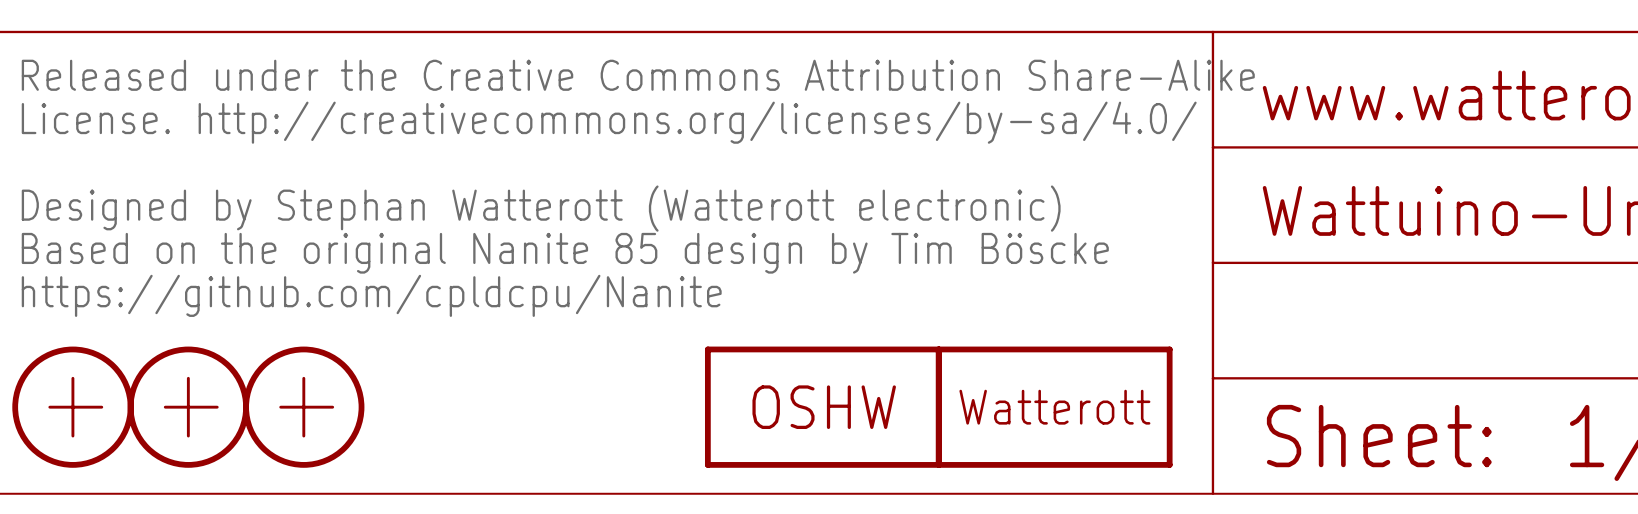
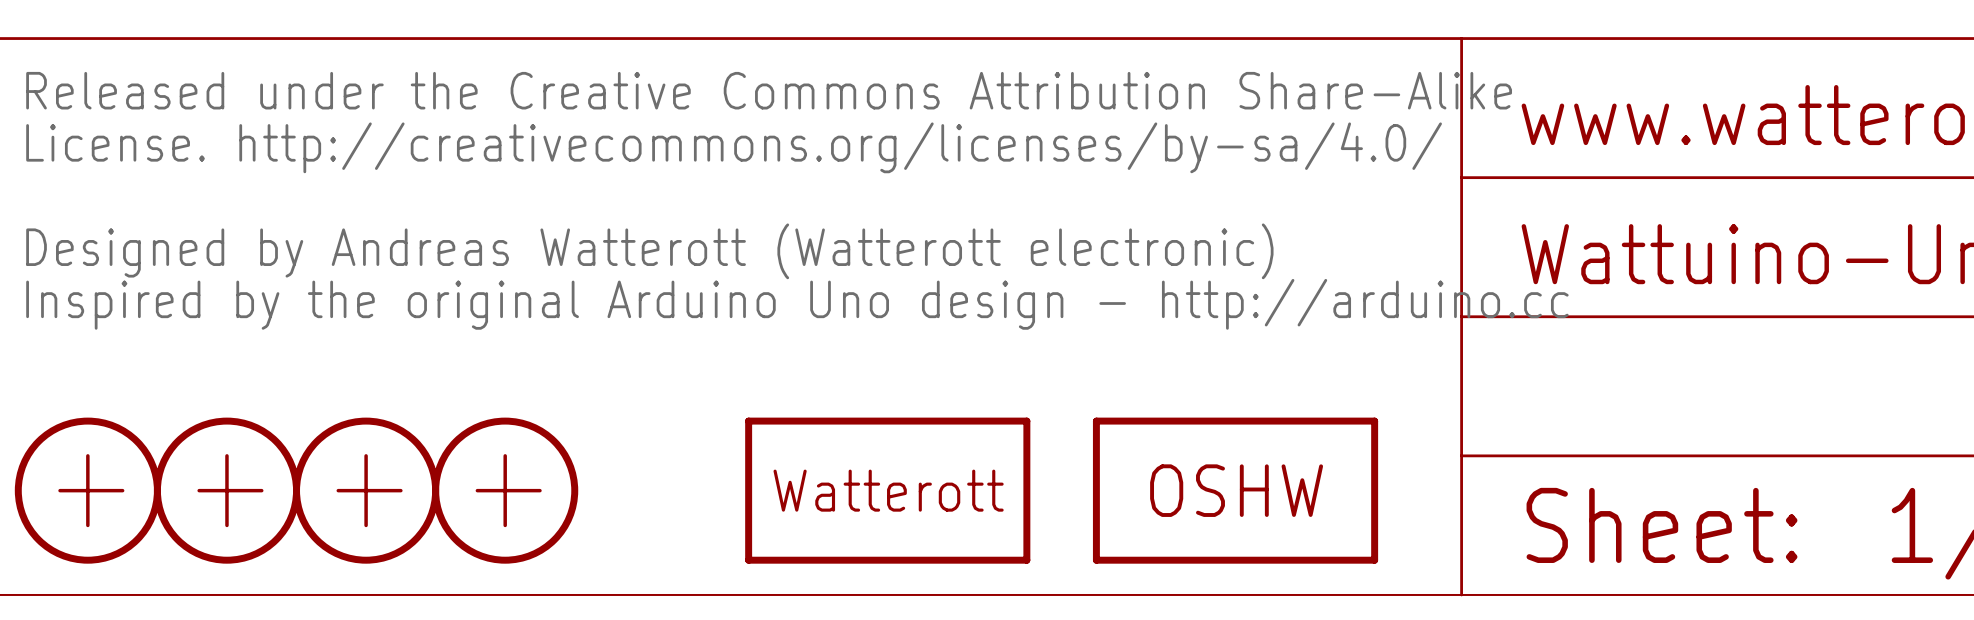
text: Designed by Stephan Watterott (Watterott electronic) (541, 208) -> Designed by Andreas Watterott (Watterott electronic) (649, 251)
text: Based on the original Nanite 85 design by Tim Böscke (565, 253) -> Inspired by the original Arduino Uno design - http://arduino.cc (797, 304)
text: https://github.com/cpldcpu/Nanite (371, 295) -> none
part: none -> (505, 490)
part position: (823, 407) -> (1235, 490)
part position: (1054, 407) -> (887, 490)

